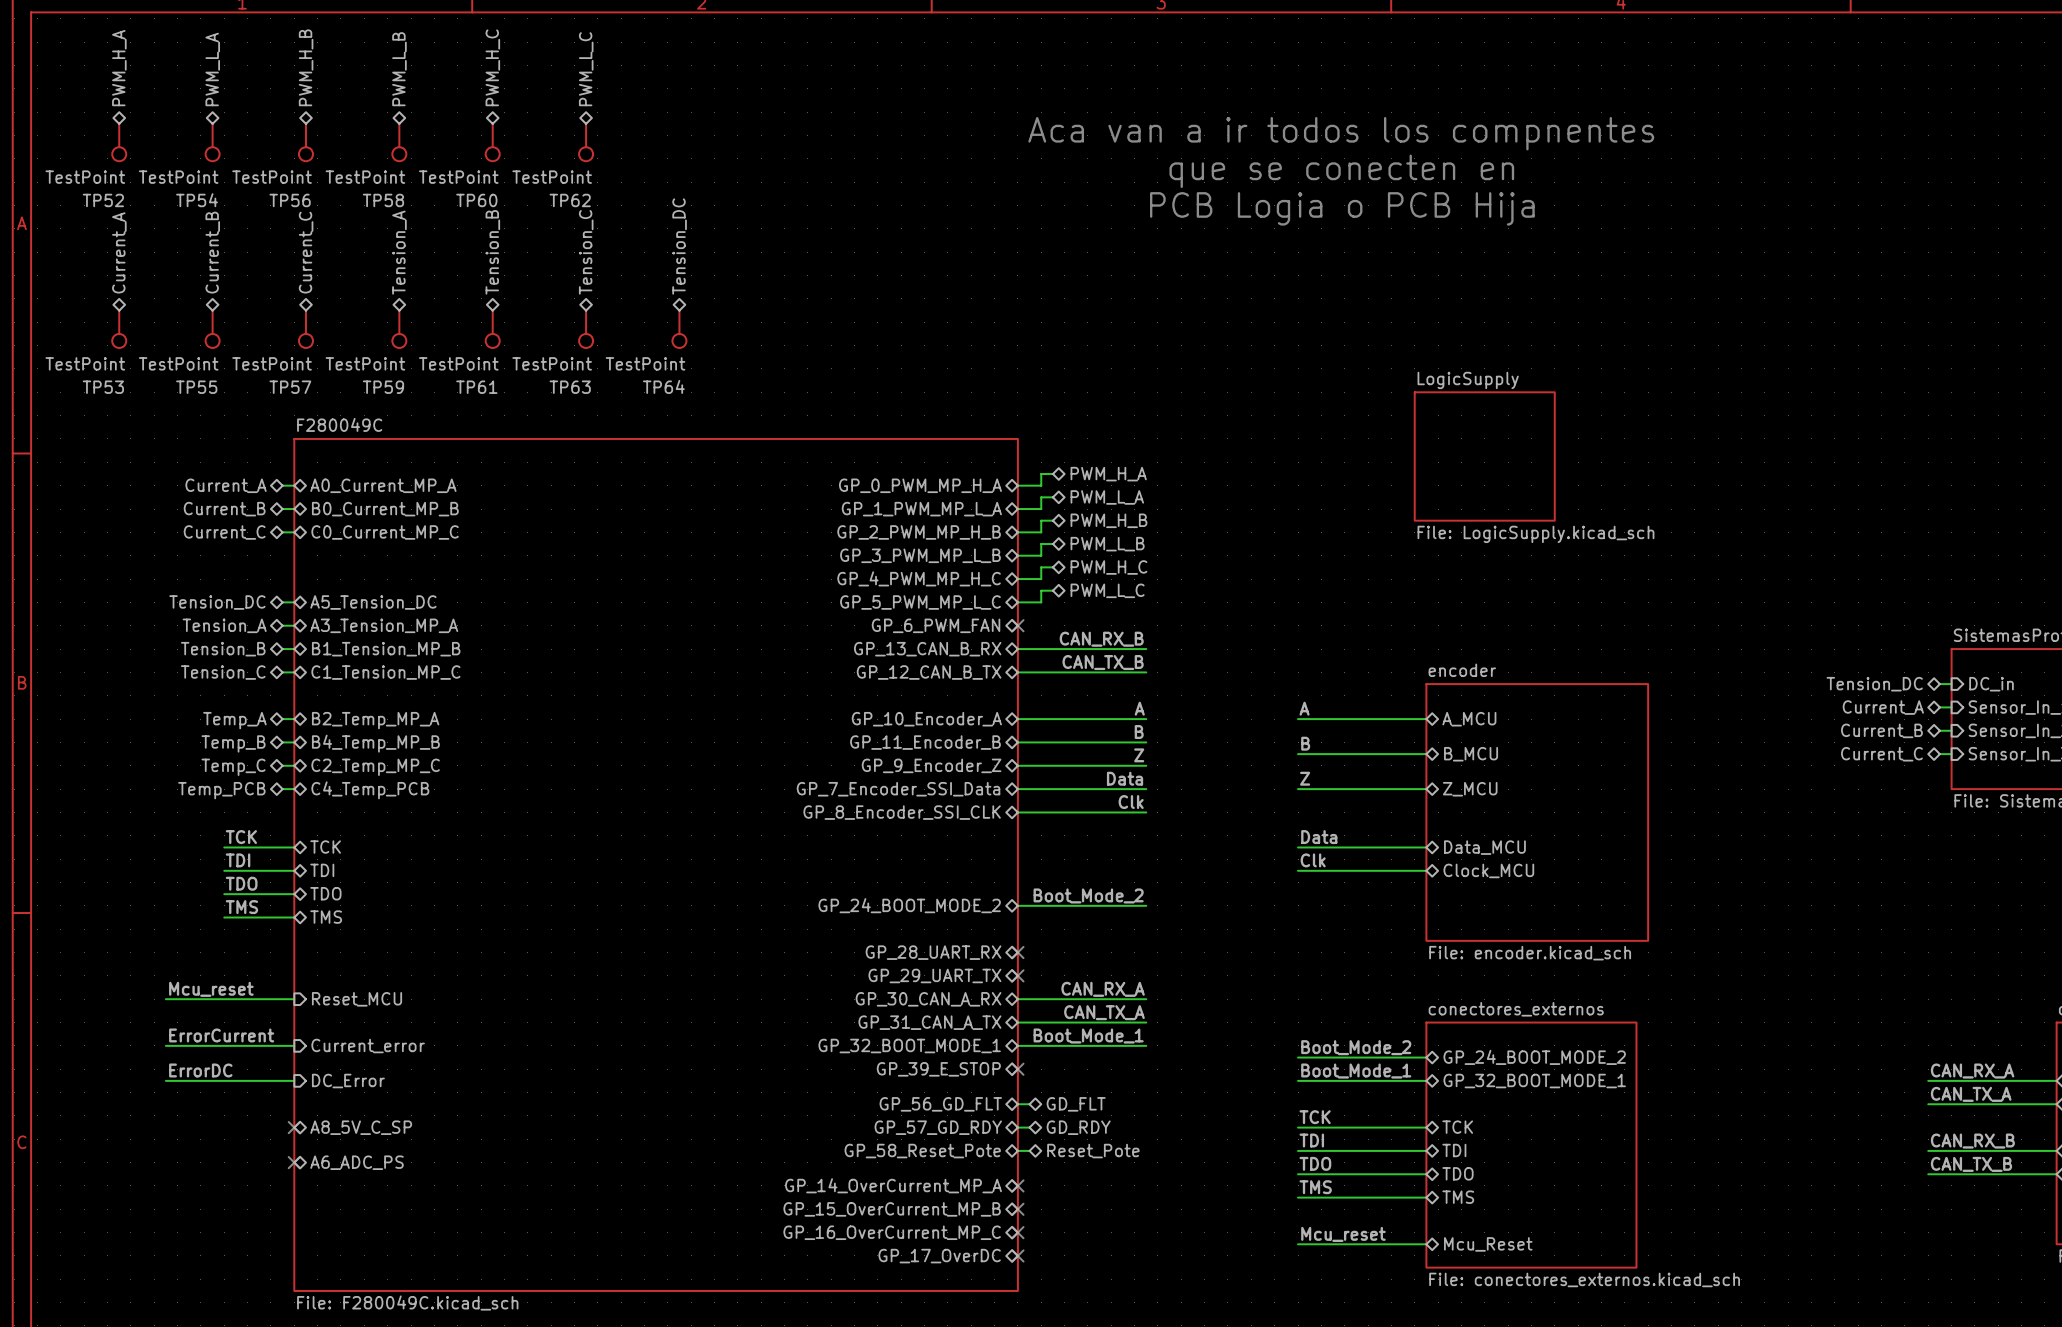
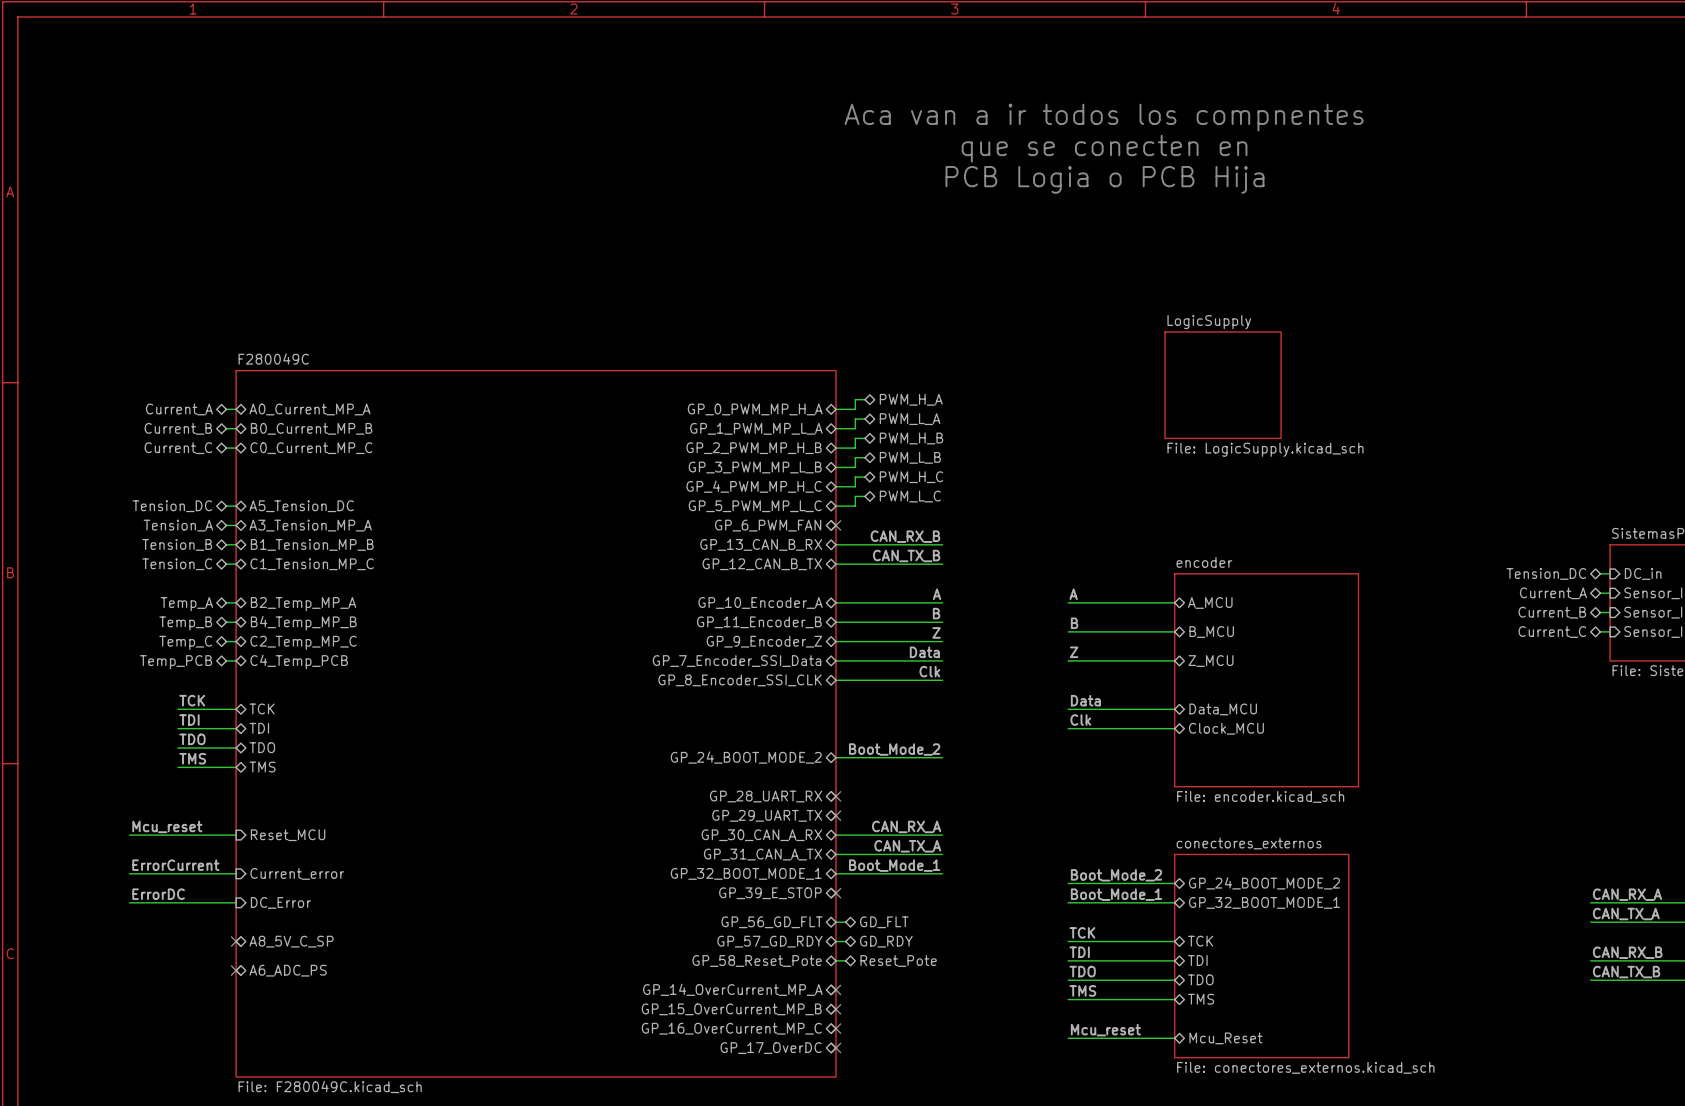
hierarchical label: PWM_H_B (306, 67) -> none
hierarchical label: PWM_H_C (492, 67) -> none
hierarchical label: PWM_H_A (119, 68) -> none
hierarchical label: PWM_L_A (212, 69) -> none
hierarchical label: PWM_L_B (399, 69) -> none
hierarchical label: PWM_L_C (586, 69) -> none
TP52: TestPoint (119, 142) -> none
TP54: TestPoint (212, 142) -> none
TP56: TestPoint (305, 142) -> none
TP58: TestPoint (399, 142) -> none
TP60: TestPoint (492, 142) -> none
TP62: TestPoint (586, 142) -> none
hierarchical label: Tension_DC (679, 246) -> none
hierarchical label: Current_A (119, 252) -> none
hierarchical label: Current_B (212, 252) -> none
hierarchical label: Current_C (306, 252) -> none
hierarchical label: Tension_A (399, 252) -> none
hierarchical label: Tension_B (492, 252) -> none
hierarchical label: Tension_C (586, 252) -> none
TP53: TestPoint (119, 329) -> none
TP55: TestPoint (212, 329) -> none
TP57: TestPoint (305, 329) -> none
TP59: TestPoint (399, 329) -> none
TP61: TestPoint (492, 329) -> none
TP63: TestPoint (586, 329) -> none
TP64: TestPoint (679, 329) -> none

